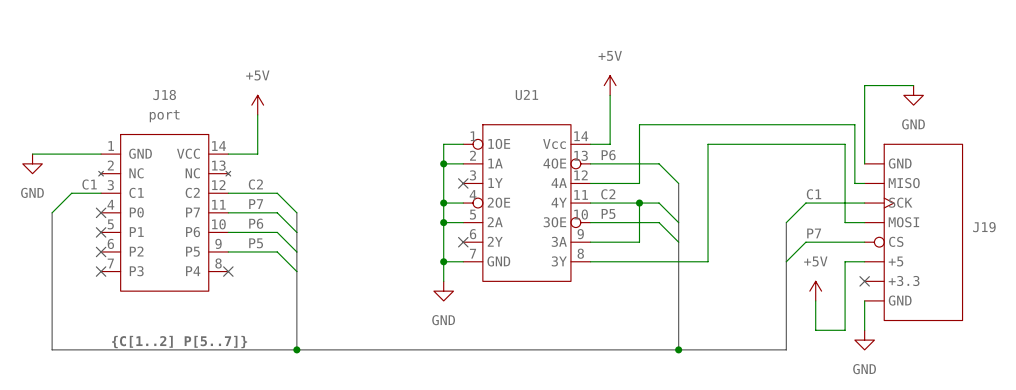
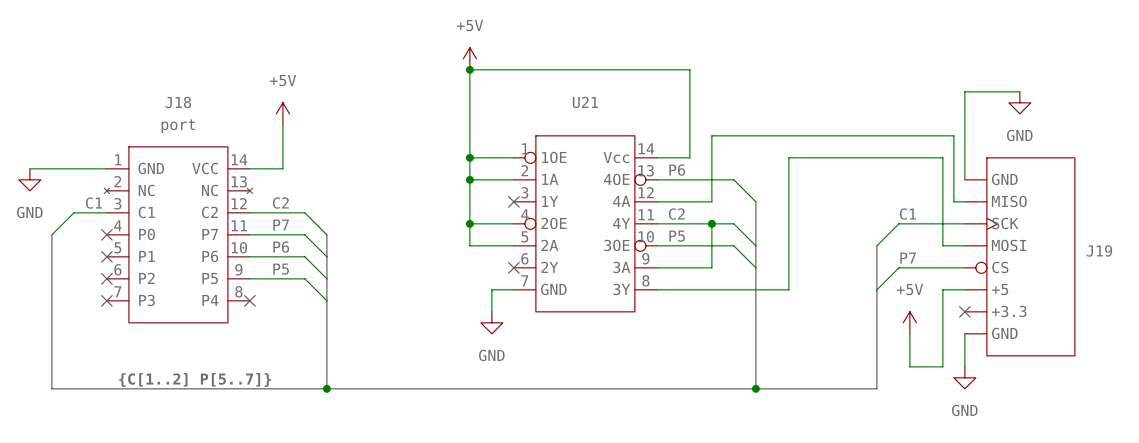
junction: none -> (469, 69)
power symbol position: +5V (610, 85) -> +5V (469, 58)
wire: (610, 95) (610, 144) -> (491, 245) (469, 245) (469, 69) (689, 69) (689, 157) (678, 157)
junction: none -> (469, 157)
wire: (443, 144) (443, 261) -> (491, 157) (469, 157)
wire: none -> (469, 179) (491, 179)
junction: none -> (469, 179)
junction: (443, 163) -> none
wire: none -> (469, 223) (491, 223)
junction: none -> (469, 223)
junction: (443, 203) -> none
junction: (443, 222) -> none
junction: (443, 261) -> none

